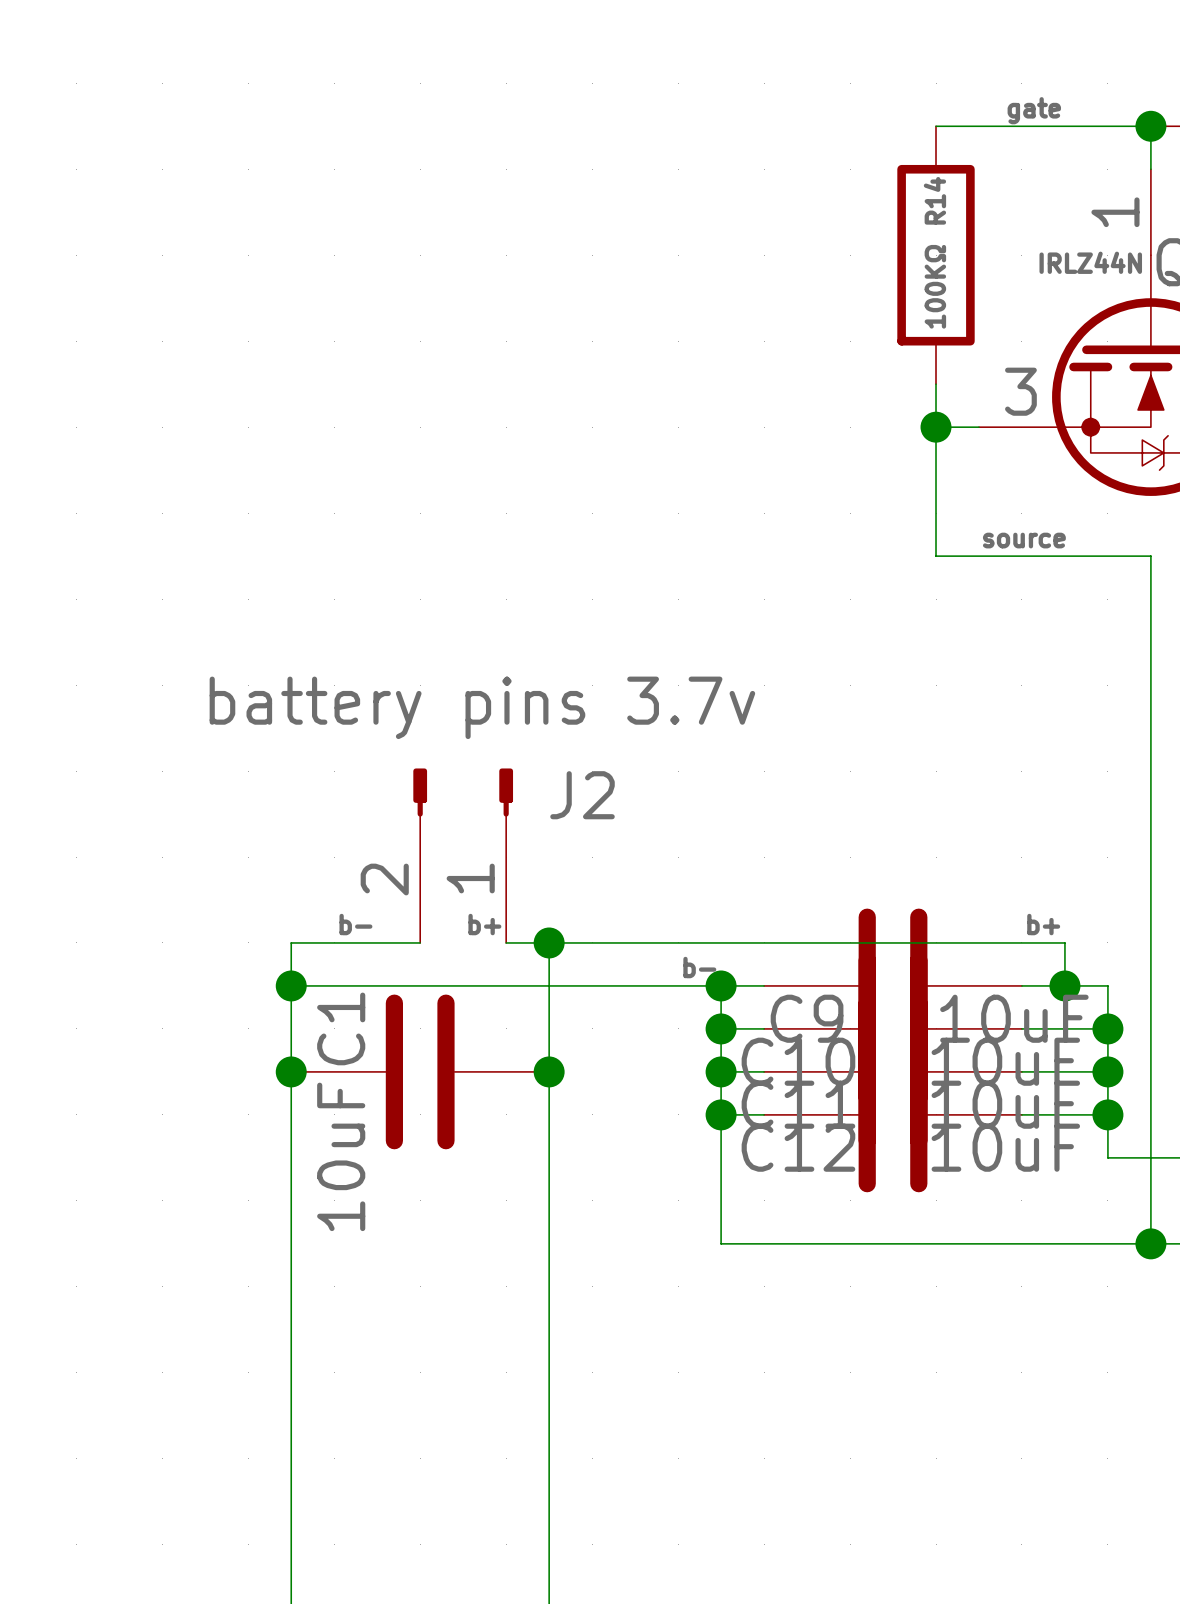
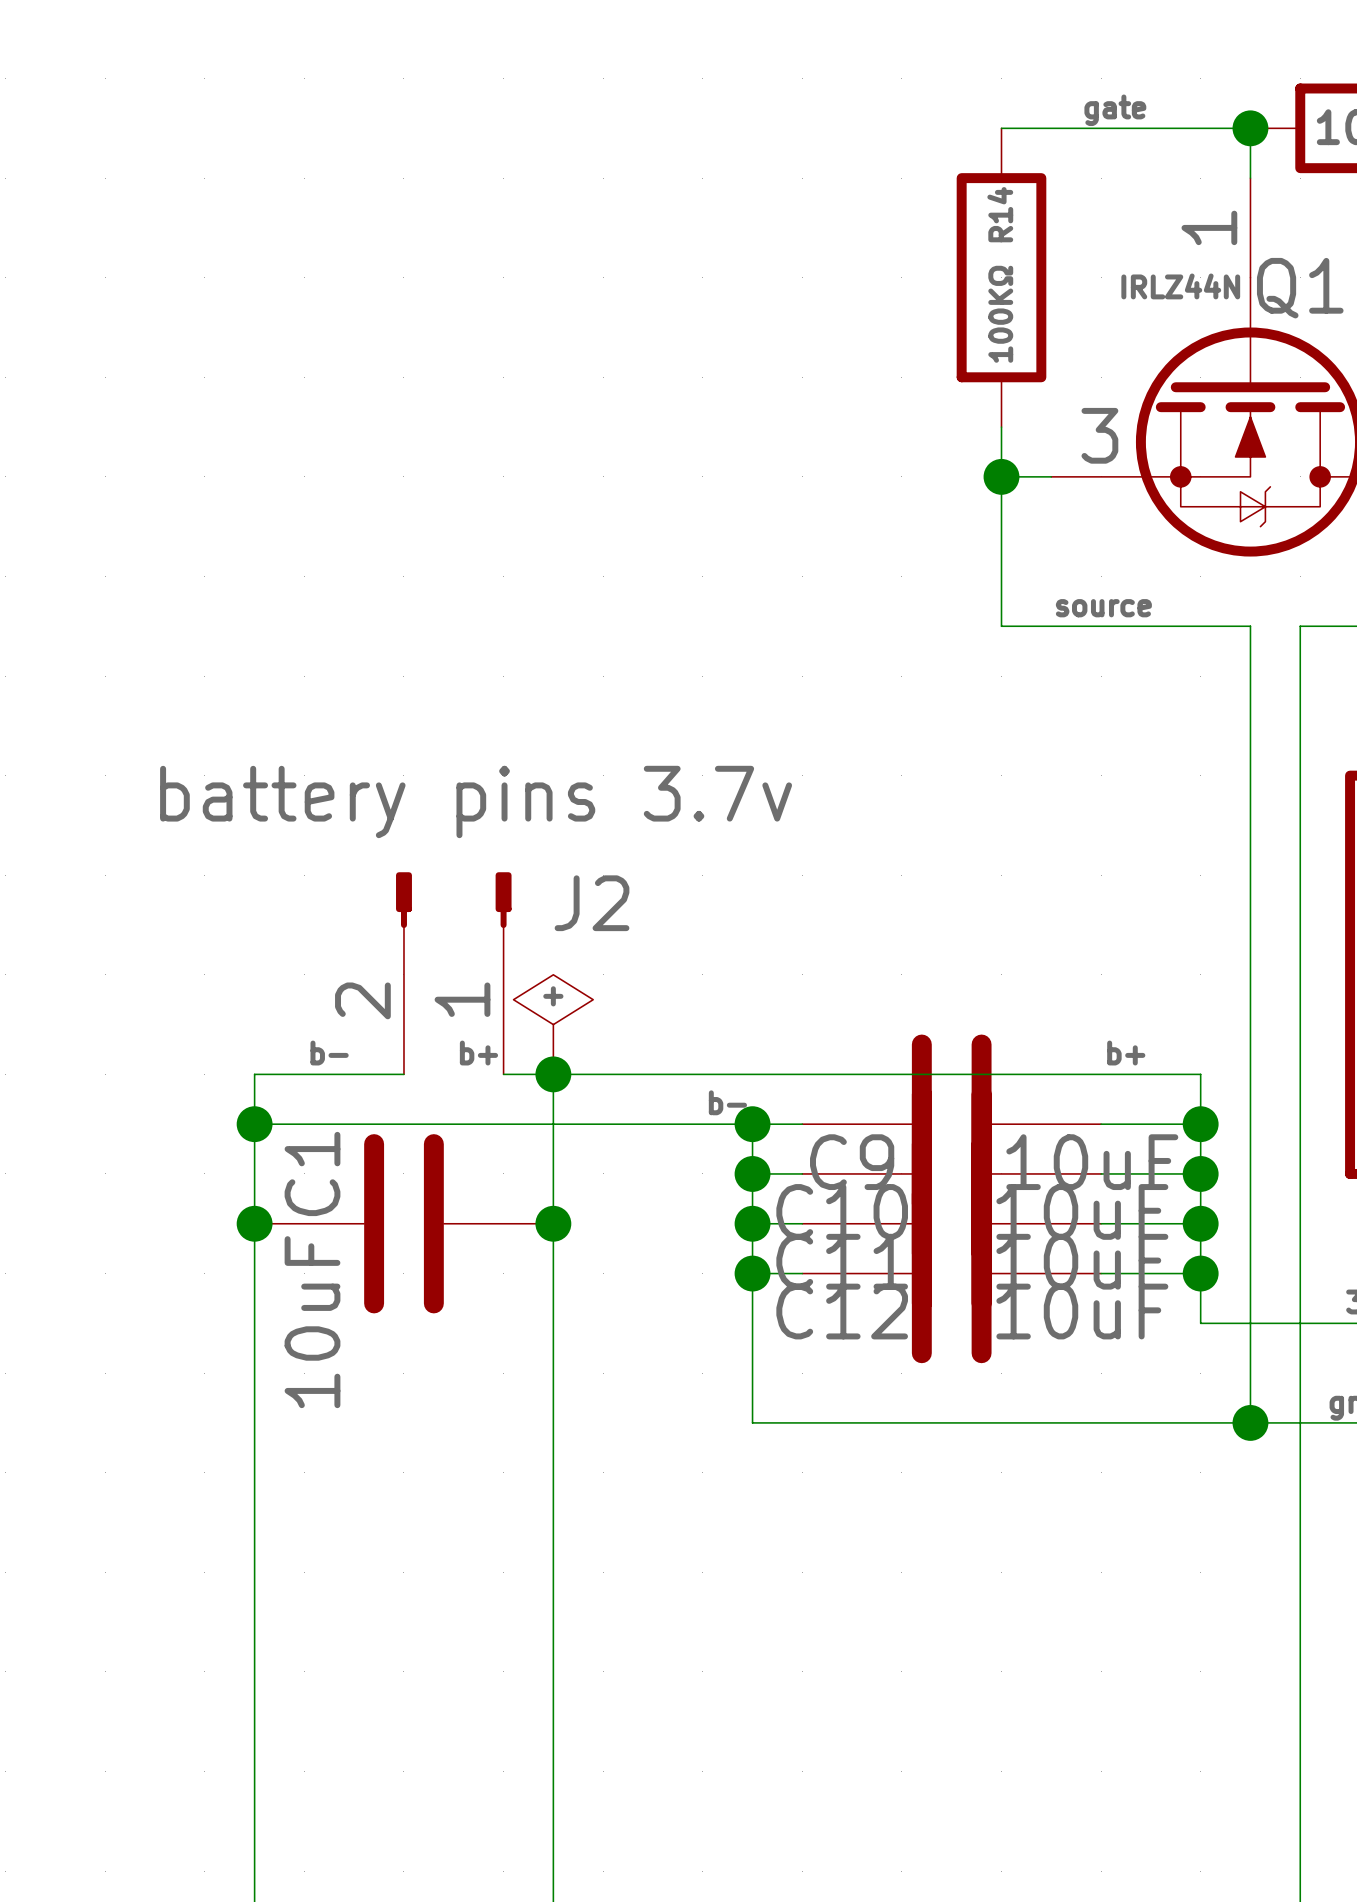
power symbol: none -> + (553, 1024)
wire: (1064, 942) (1064, 985) -> (1150, 1074) (1200, 1074) (1200, 1124)
junction position: (1064, 985) -> (1200, 1124)

